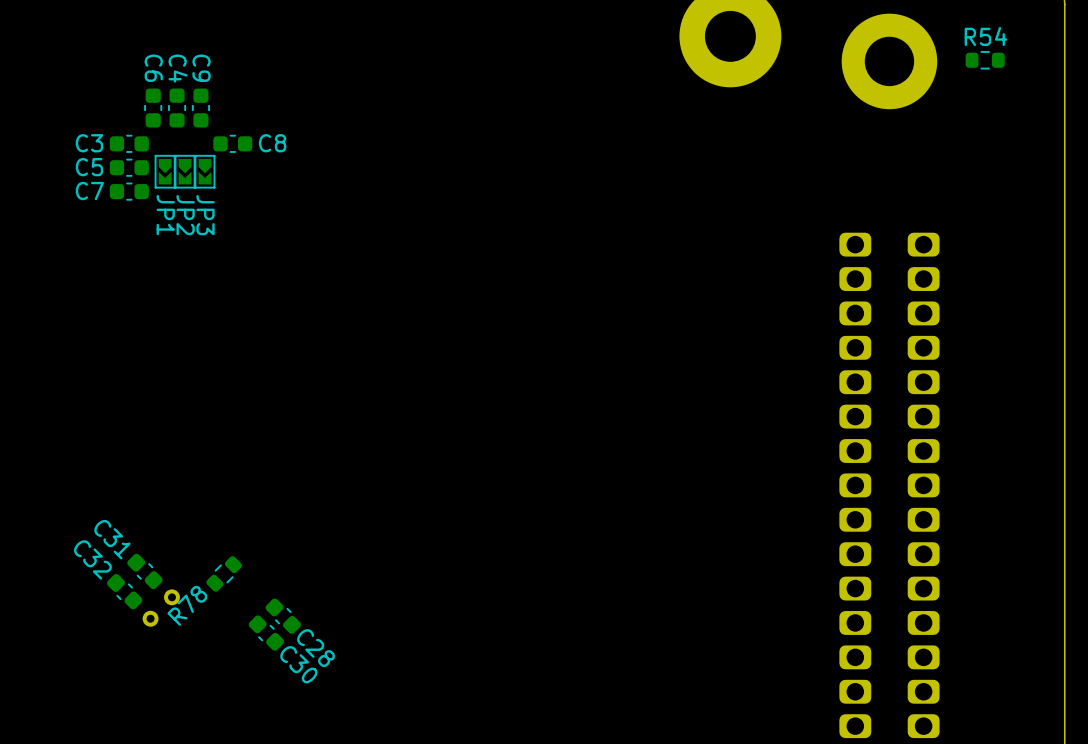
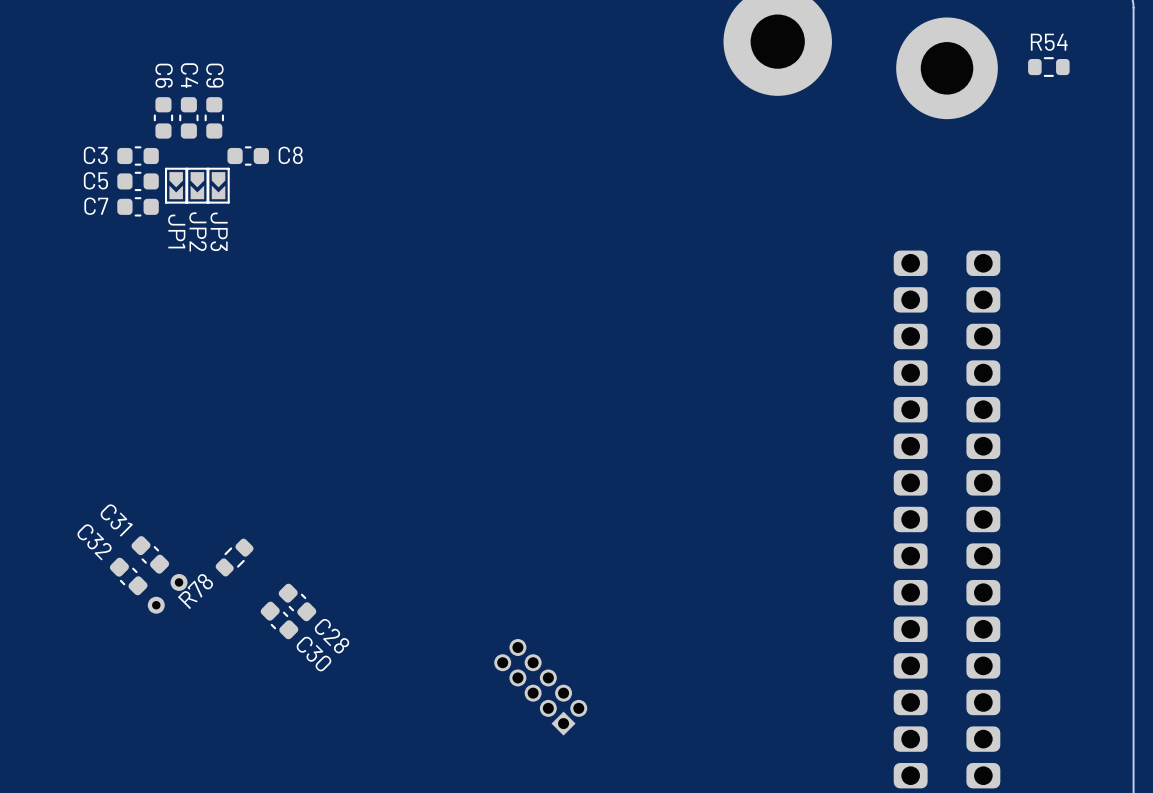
C31 position: (144, 571) -> (150, 554)
R78 position: (224, 573) -> (234, 557)
C32 position: (124, 591) -> (128, 576)
part position: (161, 608) -> (167, 593)
C28 position: (283, 616) -> (297, 602)
C30 position: (266, 633) -> (279, 620)
part: none -> (540, 687)

